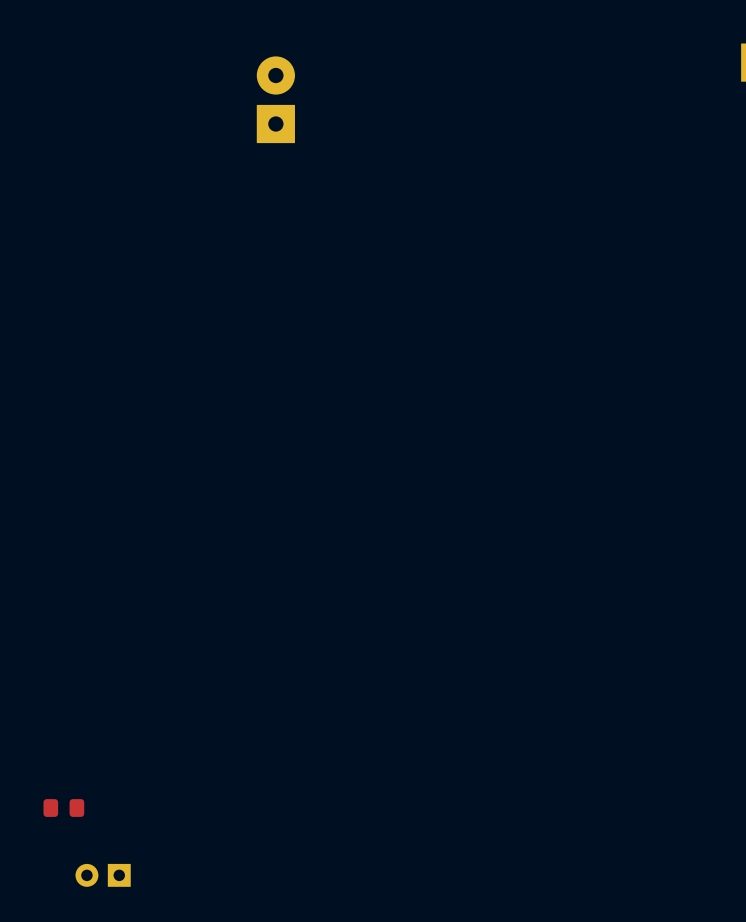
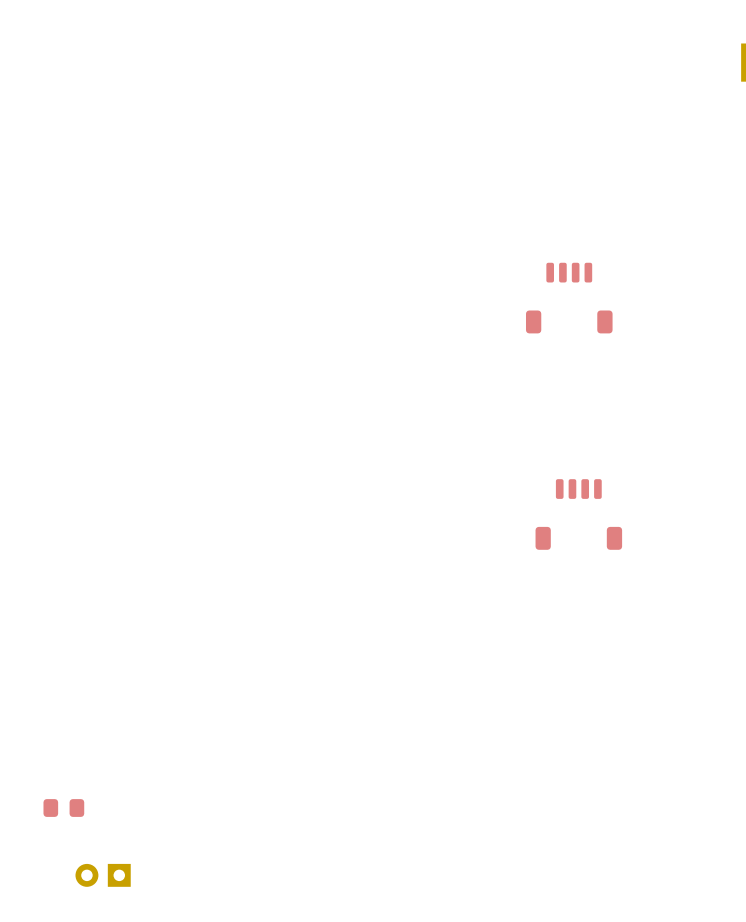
part: (275, 99) -> none
part: none -> (569, 298)
part: none -> (578, 514)

